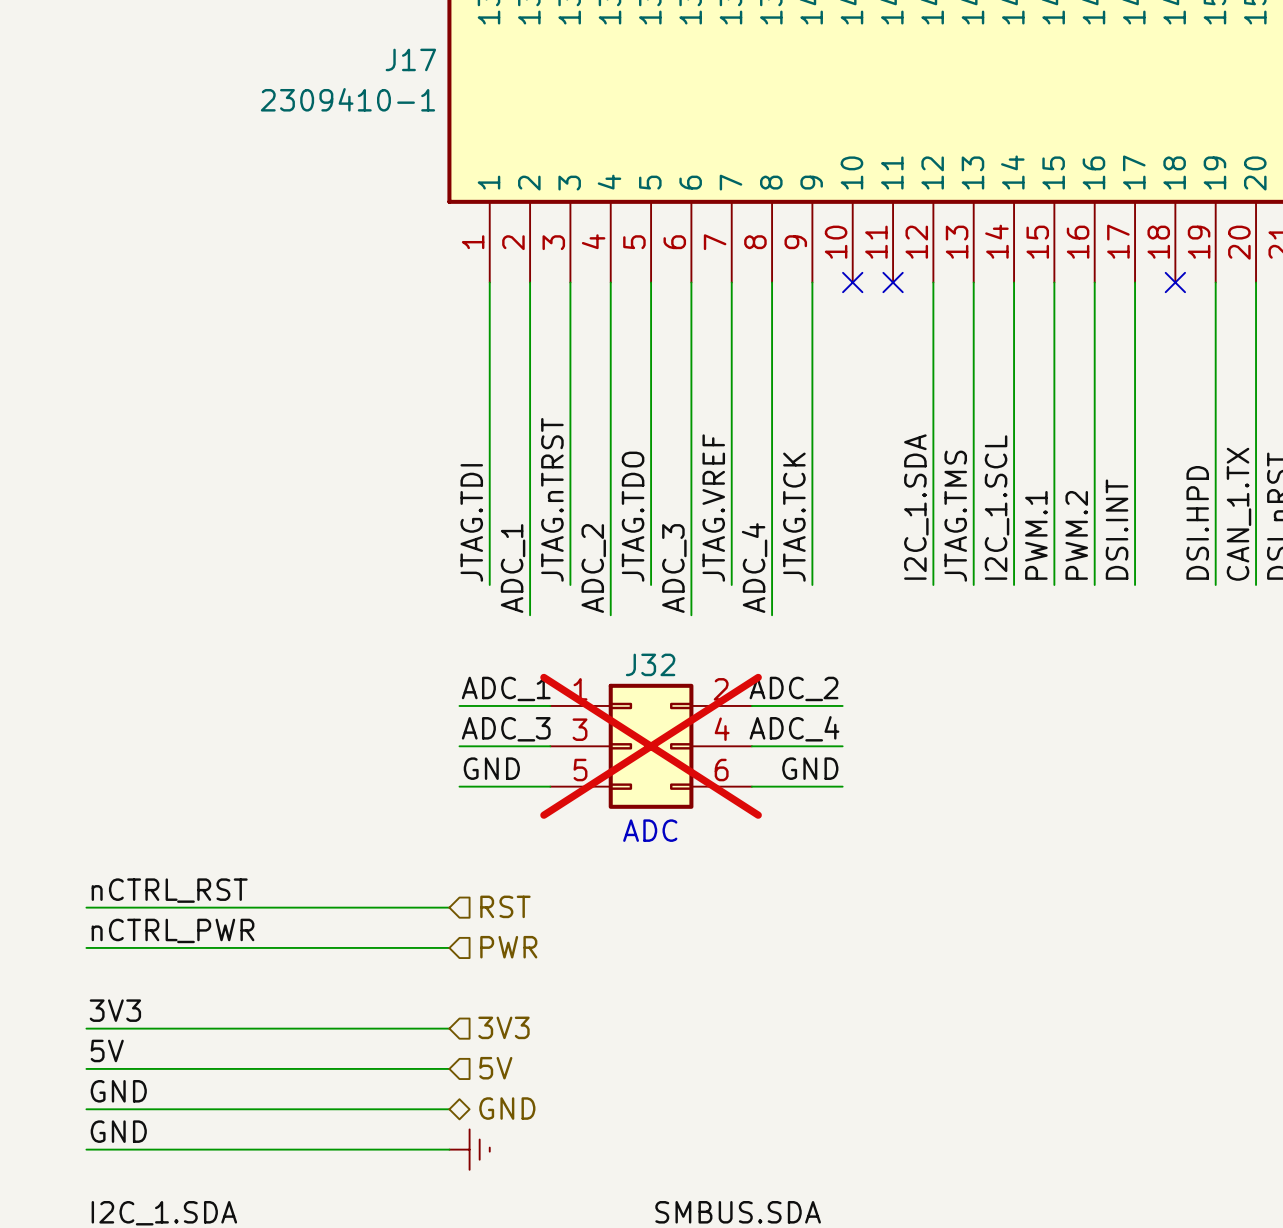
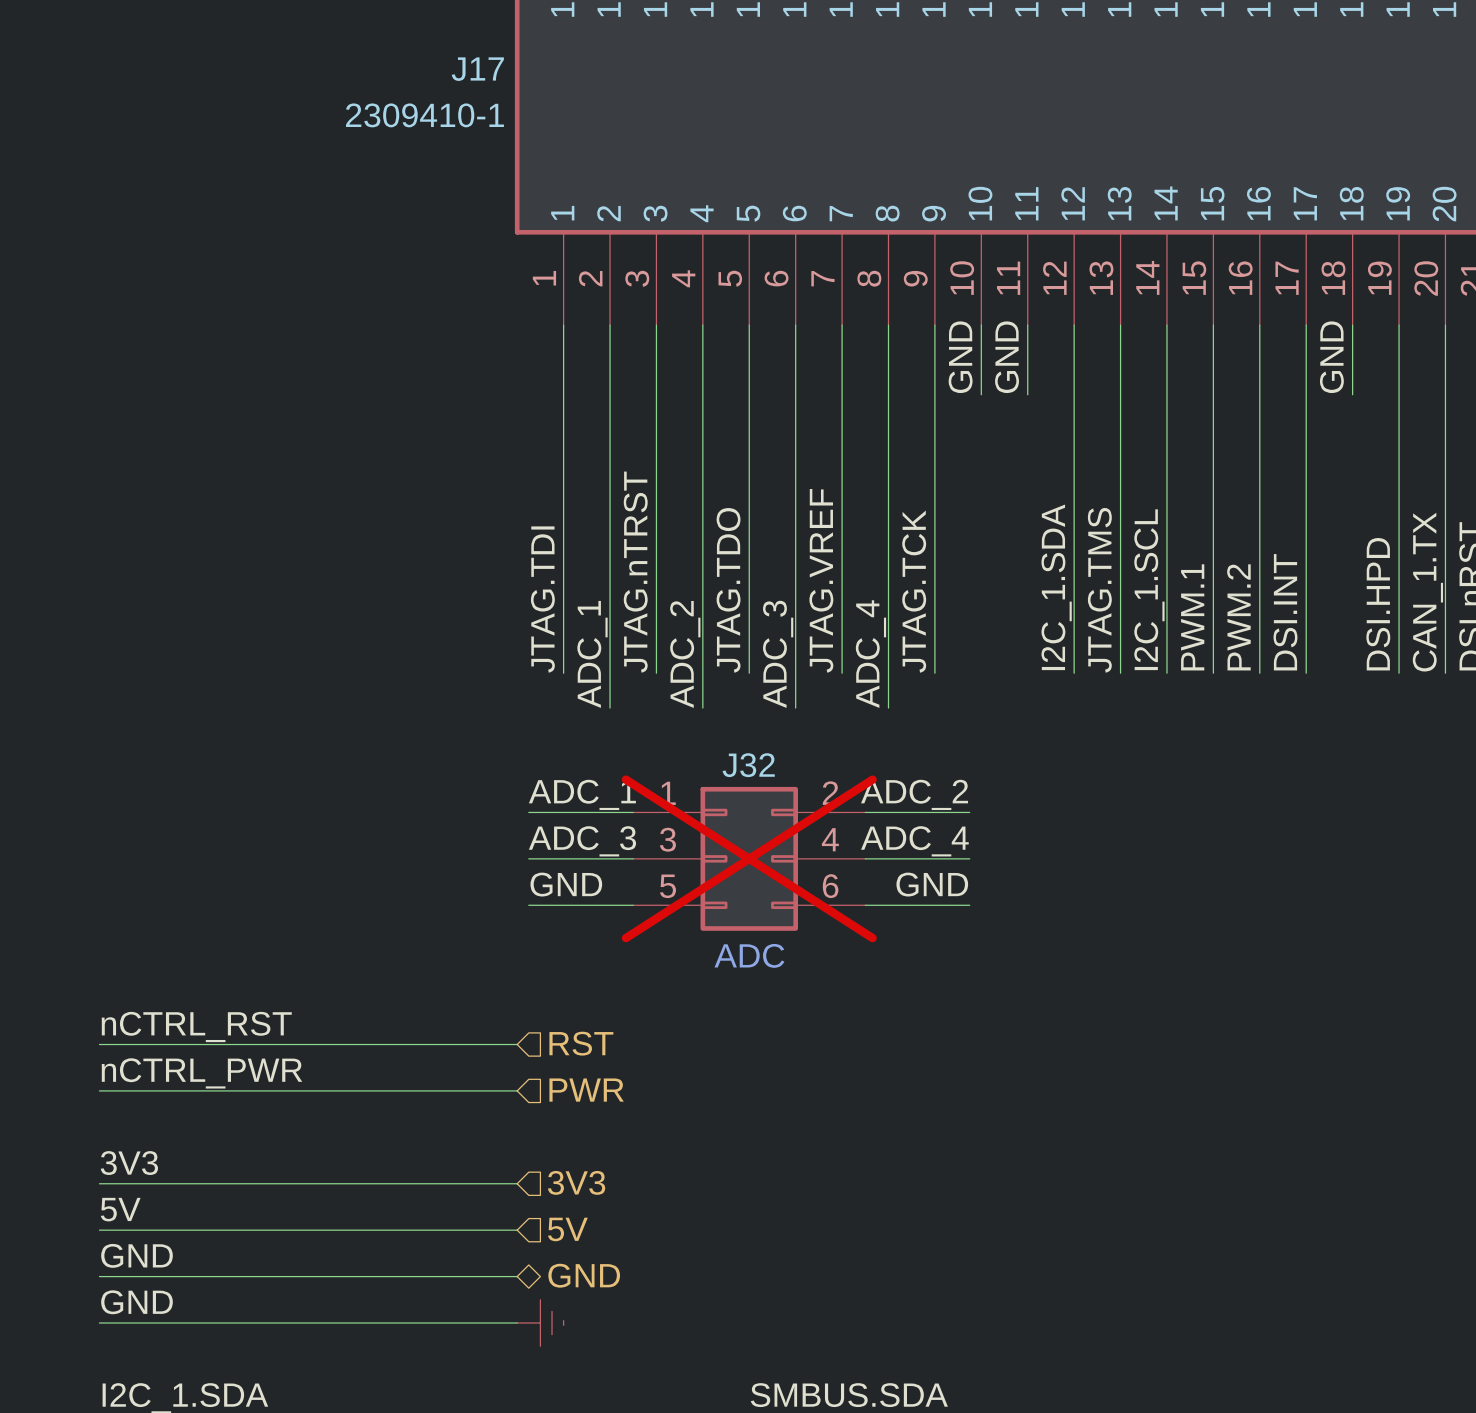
wire: none -> (981, 325) (981, 394)
no-connect mark: (852, 282) -> none
wire: none -> (1027, 325) (1027, 394)
no-connect mark: (893, 282) -> none
wire: none -> (1352, 325) (1352, 394)
no-connect mark: (1175, 282) -> none
label: none -> GND (960, 357)
label: none -> GND (1007, 357)
label: none -> GND (1331, 357)

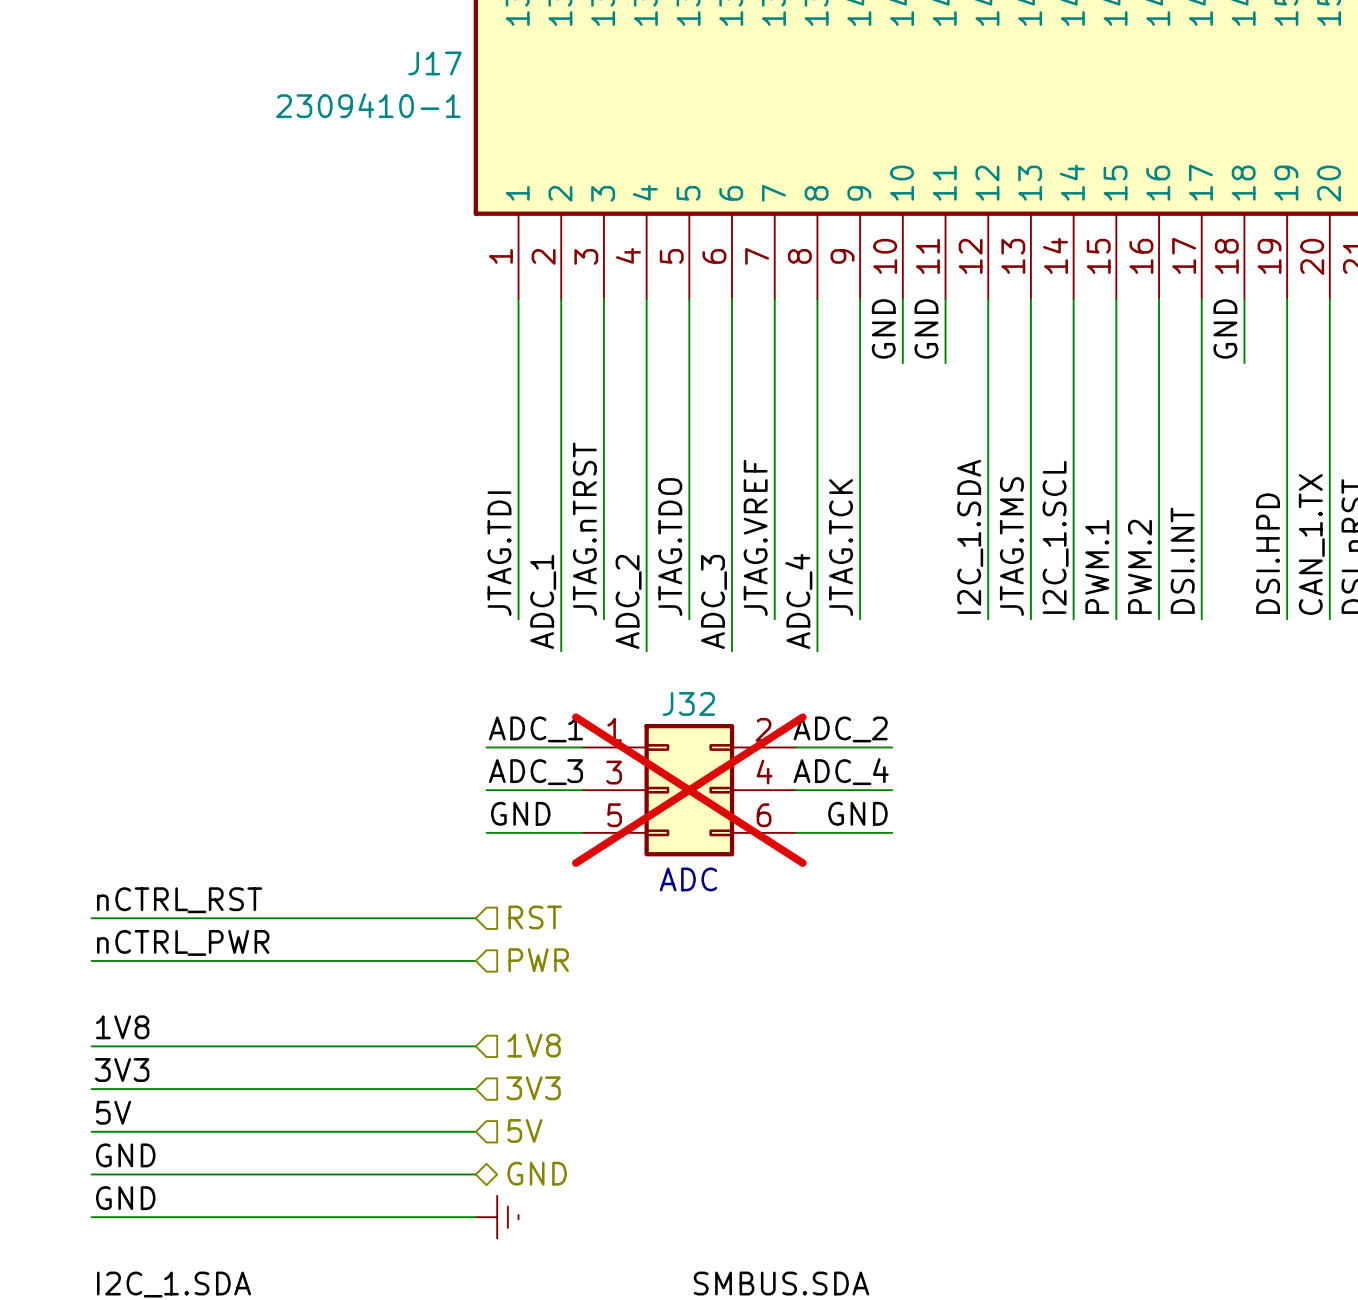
label: none -> nCTRL_RST (179, 900)
hierarchical label: none -> RST (535, 917)
wire: none -> (91, 918) (475, 918)
label: nCTRL_RST (196, 1026) -> nCTRL_PWR (183, 942)
hierarchical label: RST (581, 1043) -> PWR (538, 960)
label: nCTRL_PWR (201, 1073) -> none
wire: (99, 1090) (517, 1090) -> (91, 1046) (475, 1046)
hierarchical label: PWR (586, 1090) -> none
label: none -> 1V8 (122, 1027)
hierarchical label: none -> 1V8 (534, 1045)

